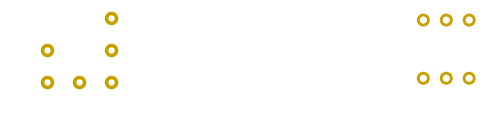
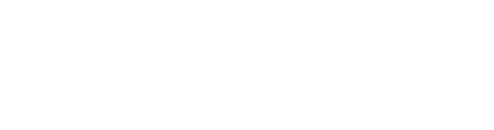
part: (111, 18) -> none
part: (446, 20) -> none
part: (47, 50) -> none
part: (111, 50) -> none
part: (446, 78) -> none
part: (47, 82) -> none
part: (79, 82) -> none
part: (111, 82) -> none

